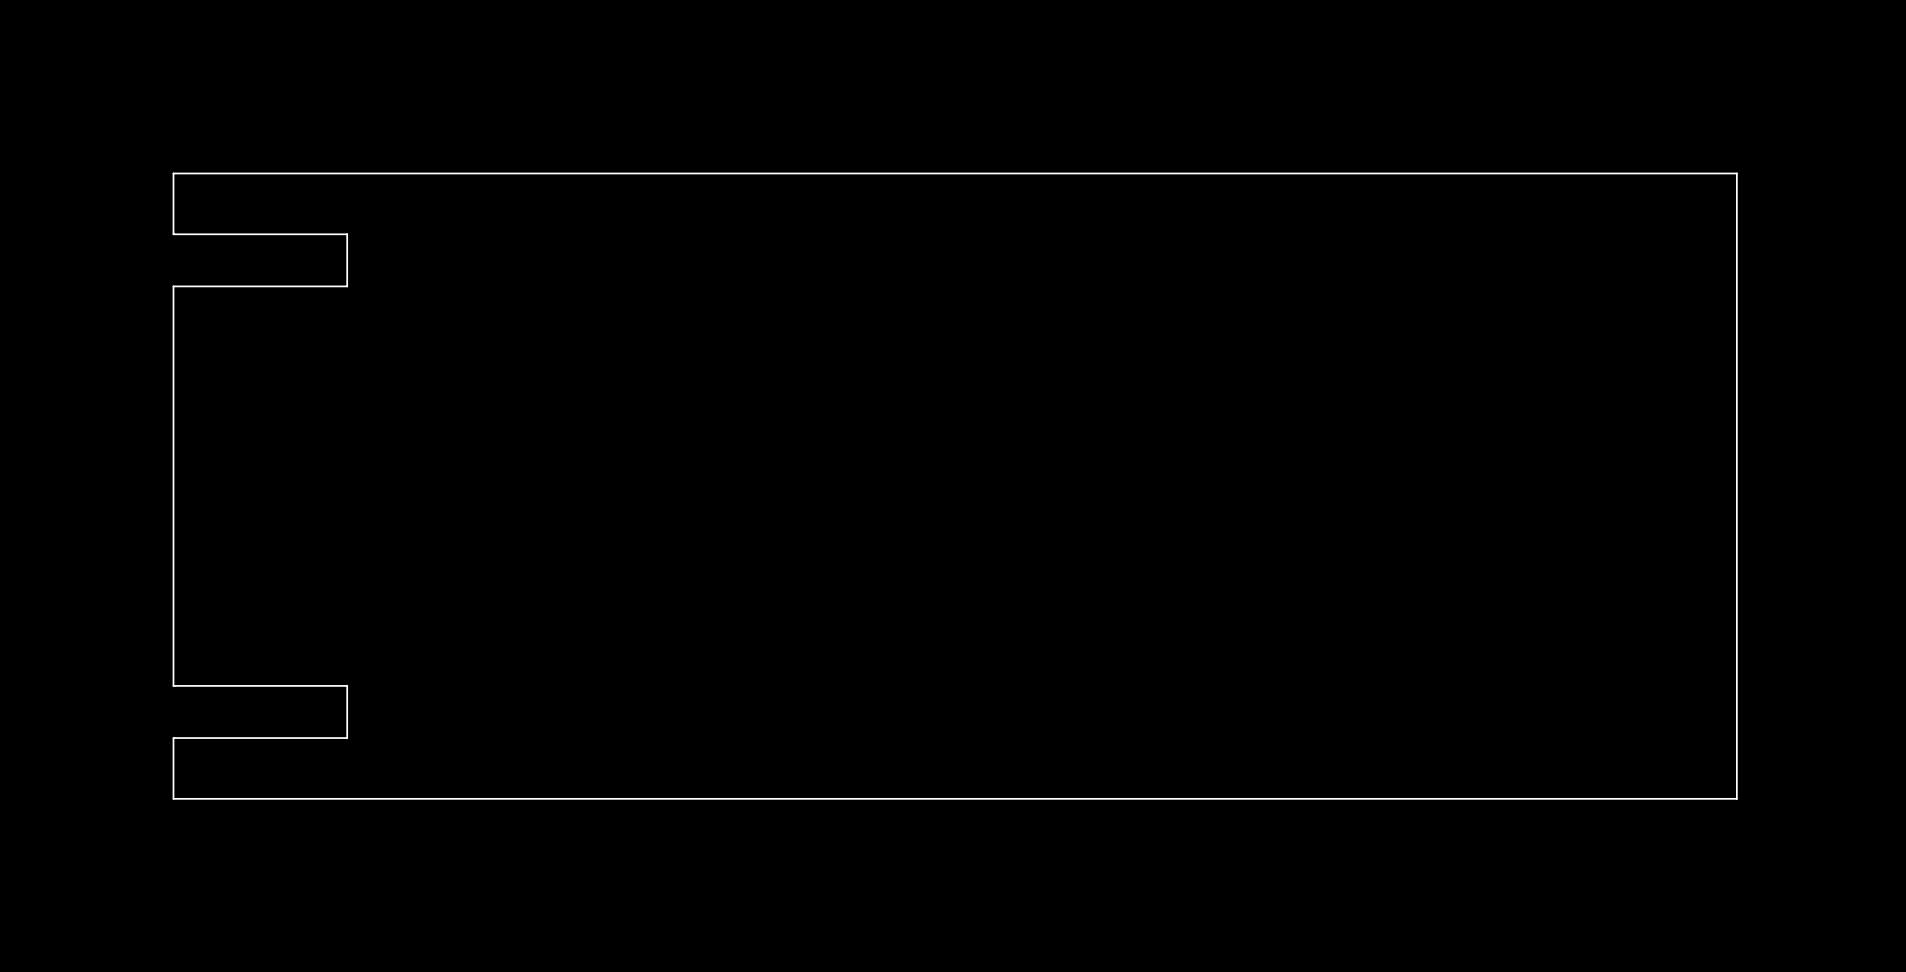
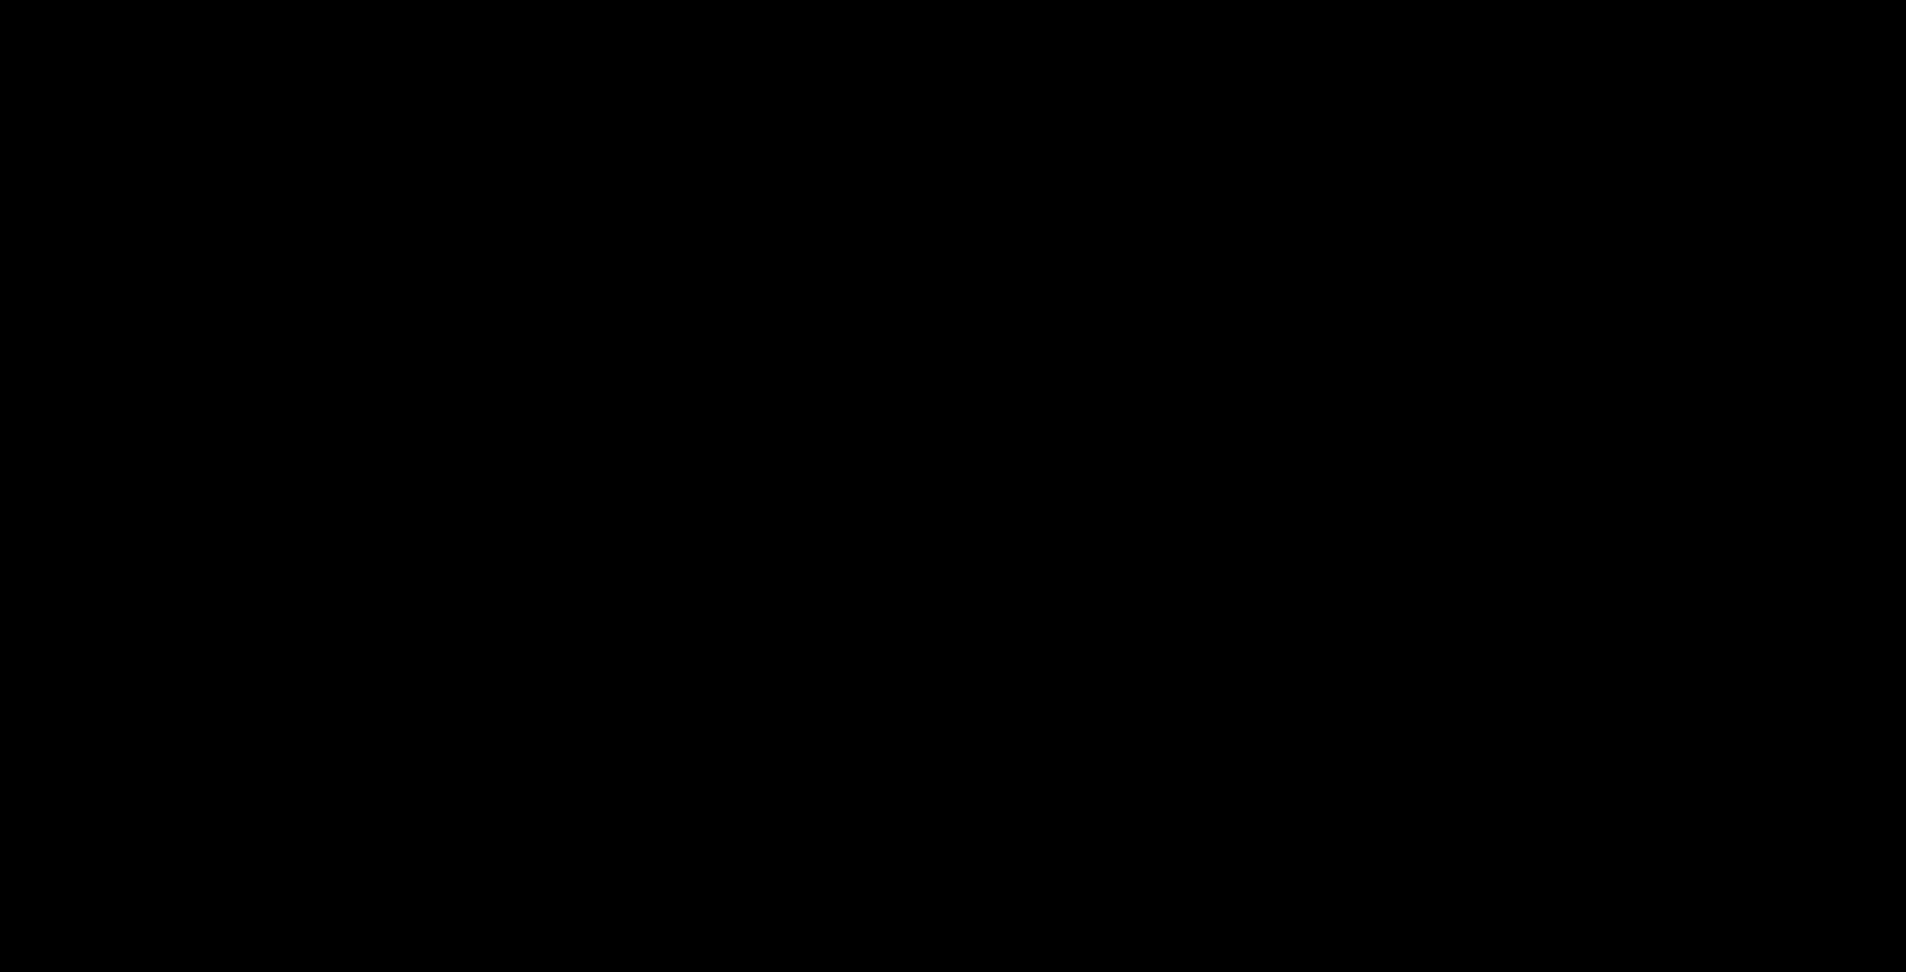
board edge: (173, 173) (173, 234) (347, 234) (347, 286) (173, 286) (173, 685) (347, 685) (347, 738) (173, 738) (173, 798) (1736, 798) (1736, 173) (173, 173) -> none

